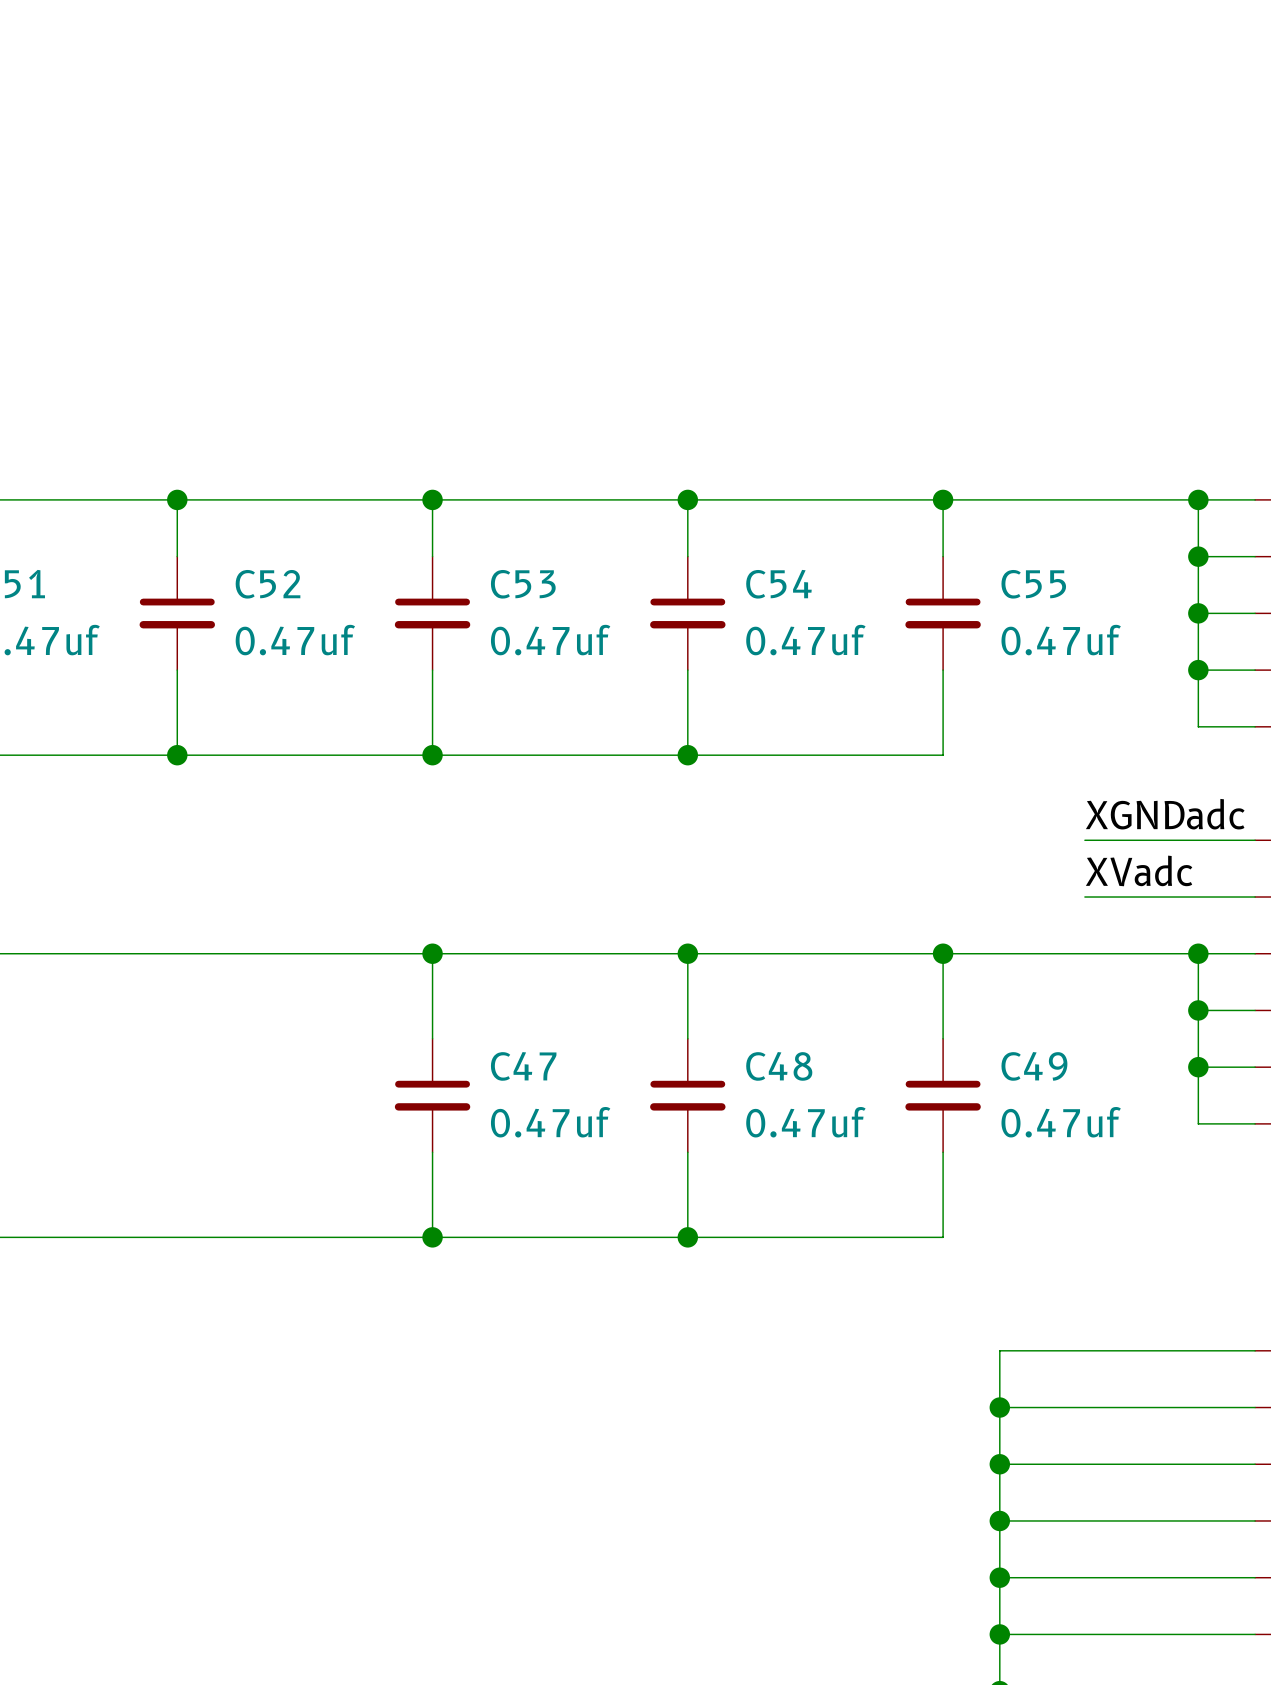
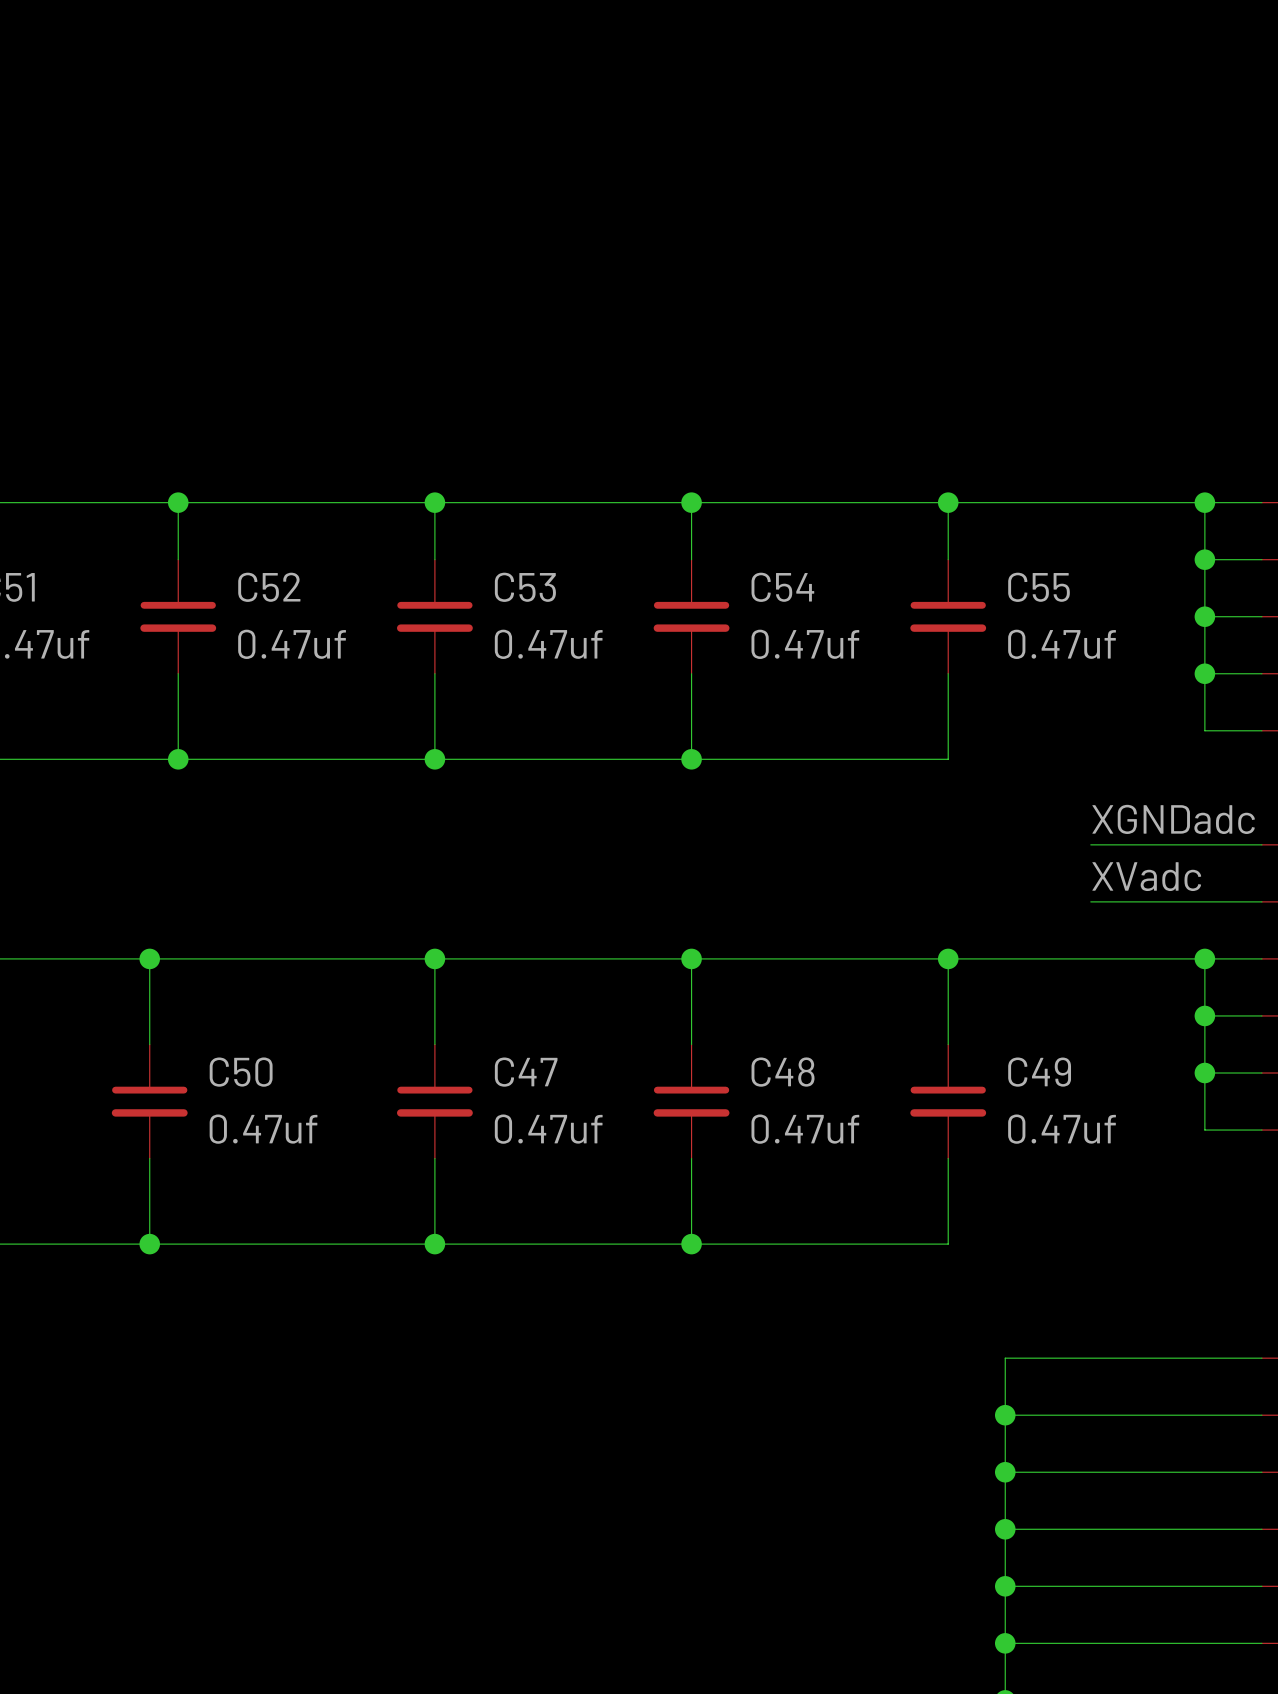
wire: none -> (149, 958) (149, 1044)
junction: none -> (149, 958)
C50: none -> 0.47uf (149, 1101)
wire: none -> (149, 1158) (149, 1244)
junction: none -> (149, 1244)

